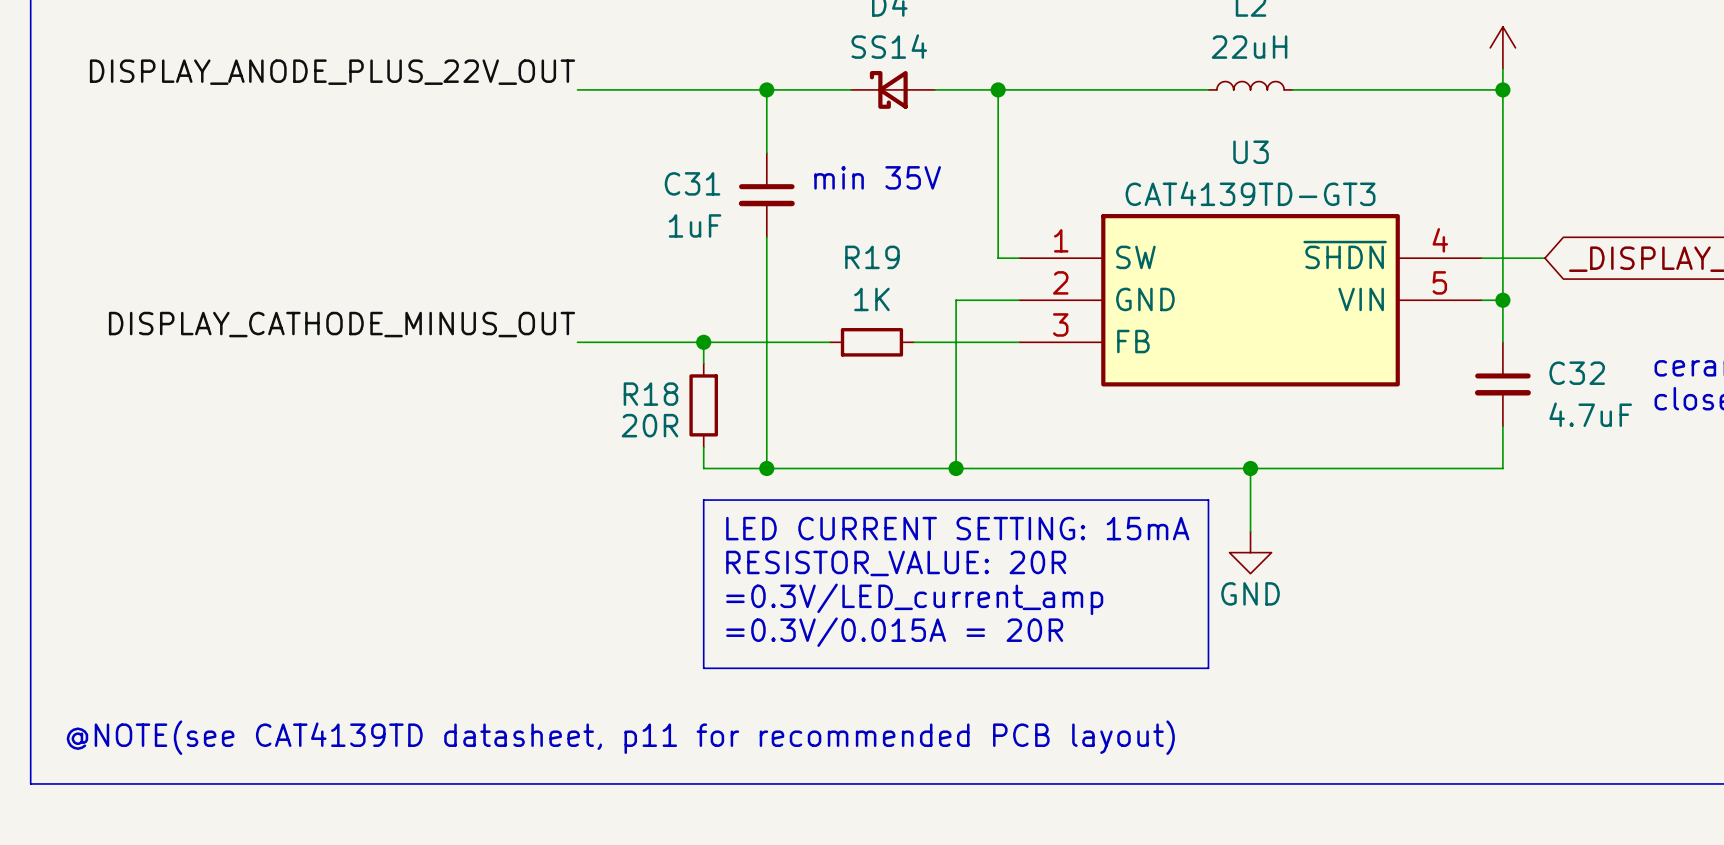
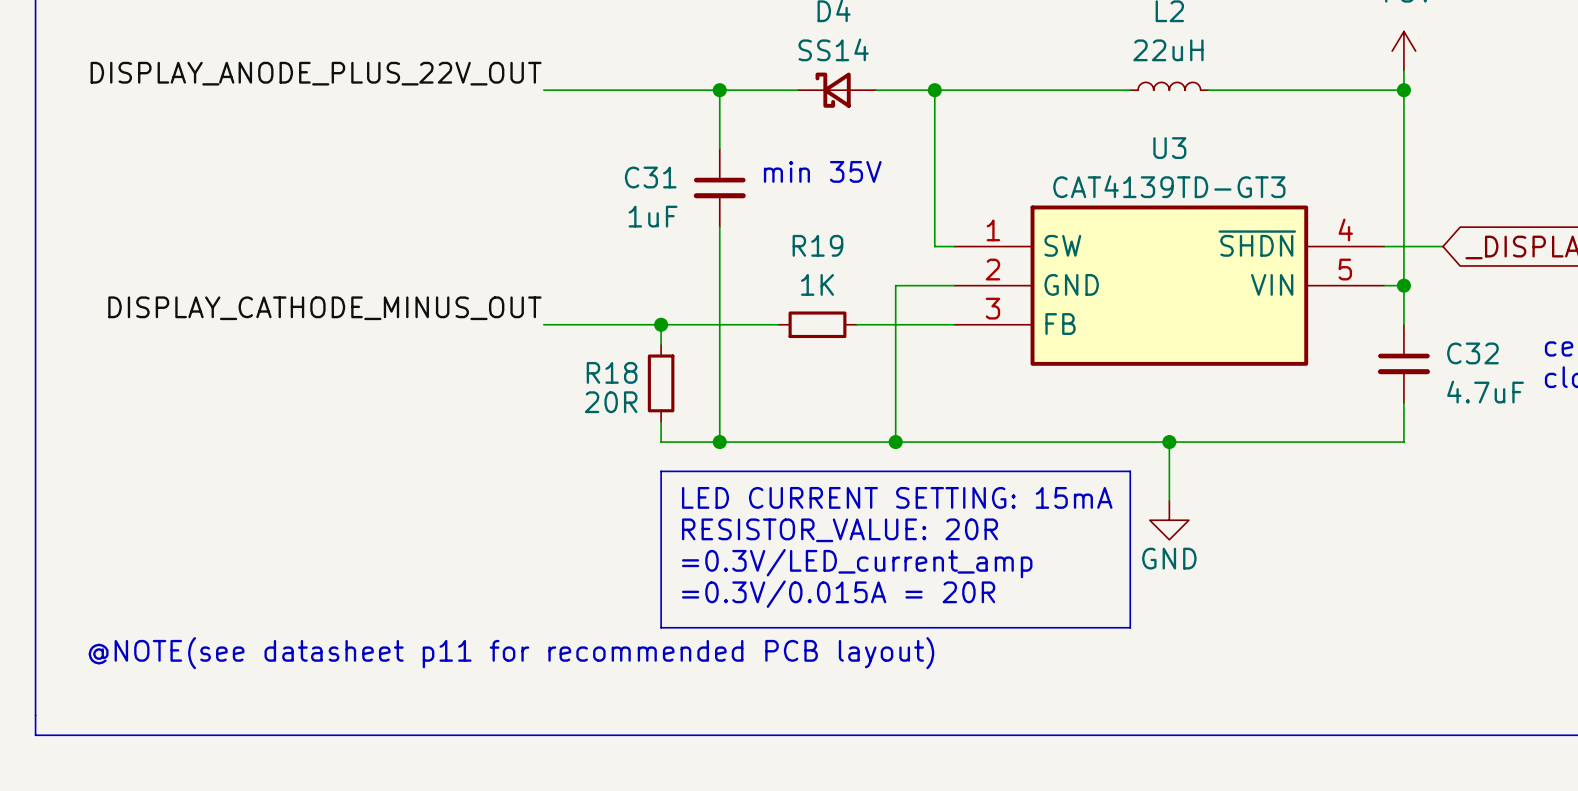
text: @NOTE(see CAT4139TD datasheet, p11 for recommended PCB layout) (620, 737) -> @NOTE(see datasheet p11 for recommended PCB layout) (511, 653)

